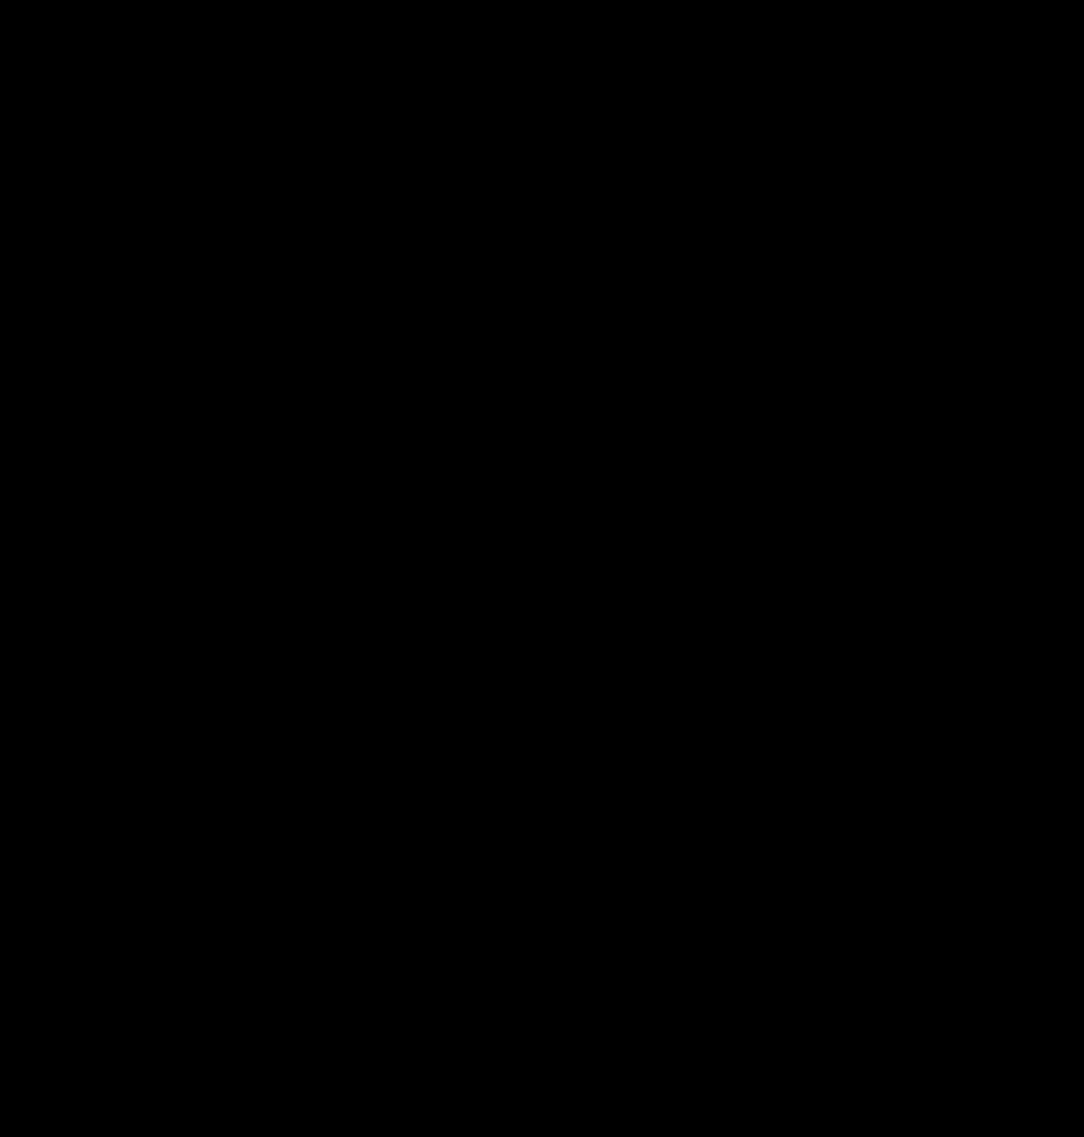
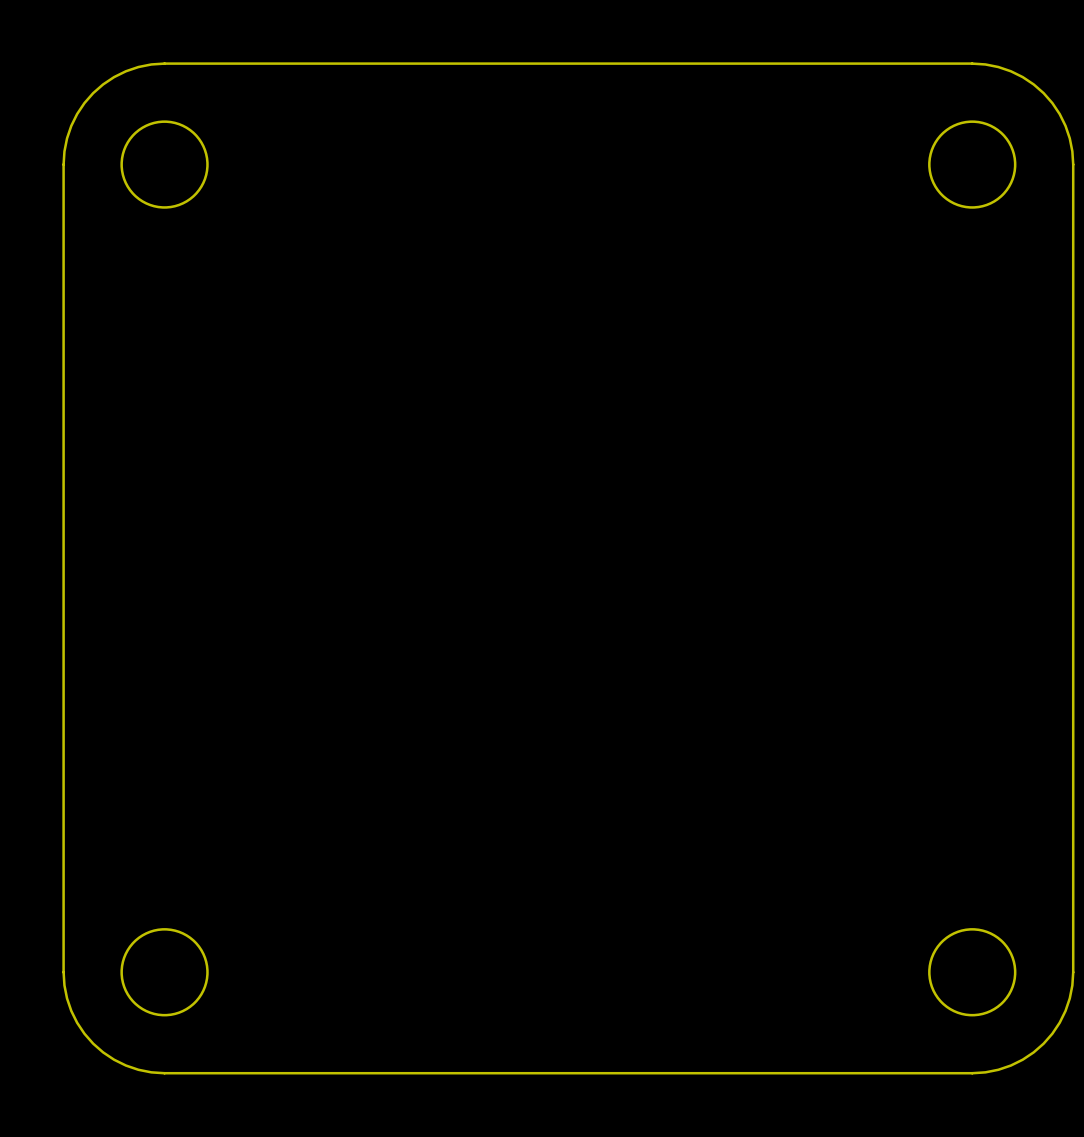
board edge: none -> (972, 63) (164, 63) (138, 67) (125, 71) (114, 77) (93, 93) (77, 114) (71, 125) (64, 151) (63, 164) (63, 972) (67, 998) (71, 1010) (77, 1022) (93, 1043) (103, 1052) (125, 1065) (138, 1069) (164, 1073) (972, 1073) (998, 1069) (1010, 1065) (1033, 1052) (1043, 1043) (1052, 1033) (1065, 1010) (1069, 998) (1073, 972) (1072, 151) (1065, 125) (1059, 114) (1043, 93) (1033, 84) (1010, 71) (998, 67) (972, 63)
round board edge: none -> [120, 120, 209, 209]
round board edge: none -> [928, 120, 1017, 209]
round board edge: none -> [120, 928, 209, 1017]
round board edge: none -> [928, 928, 1017, 1017]

